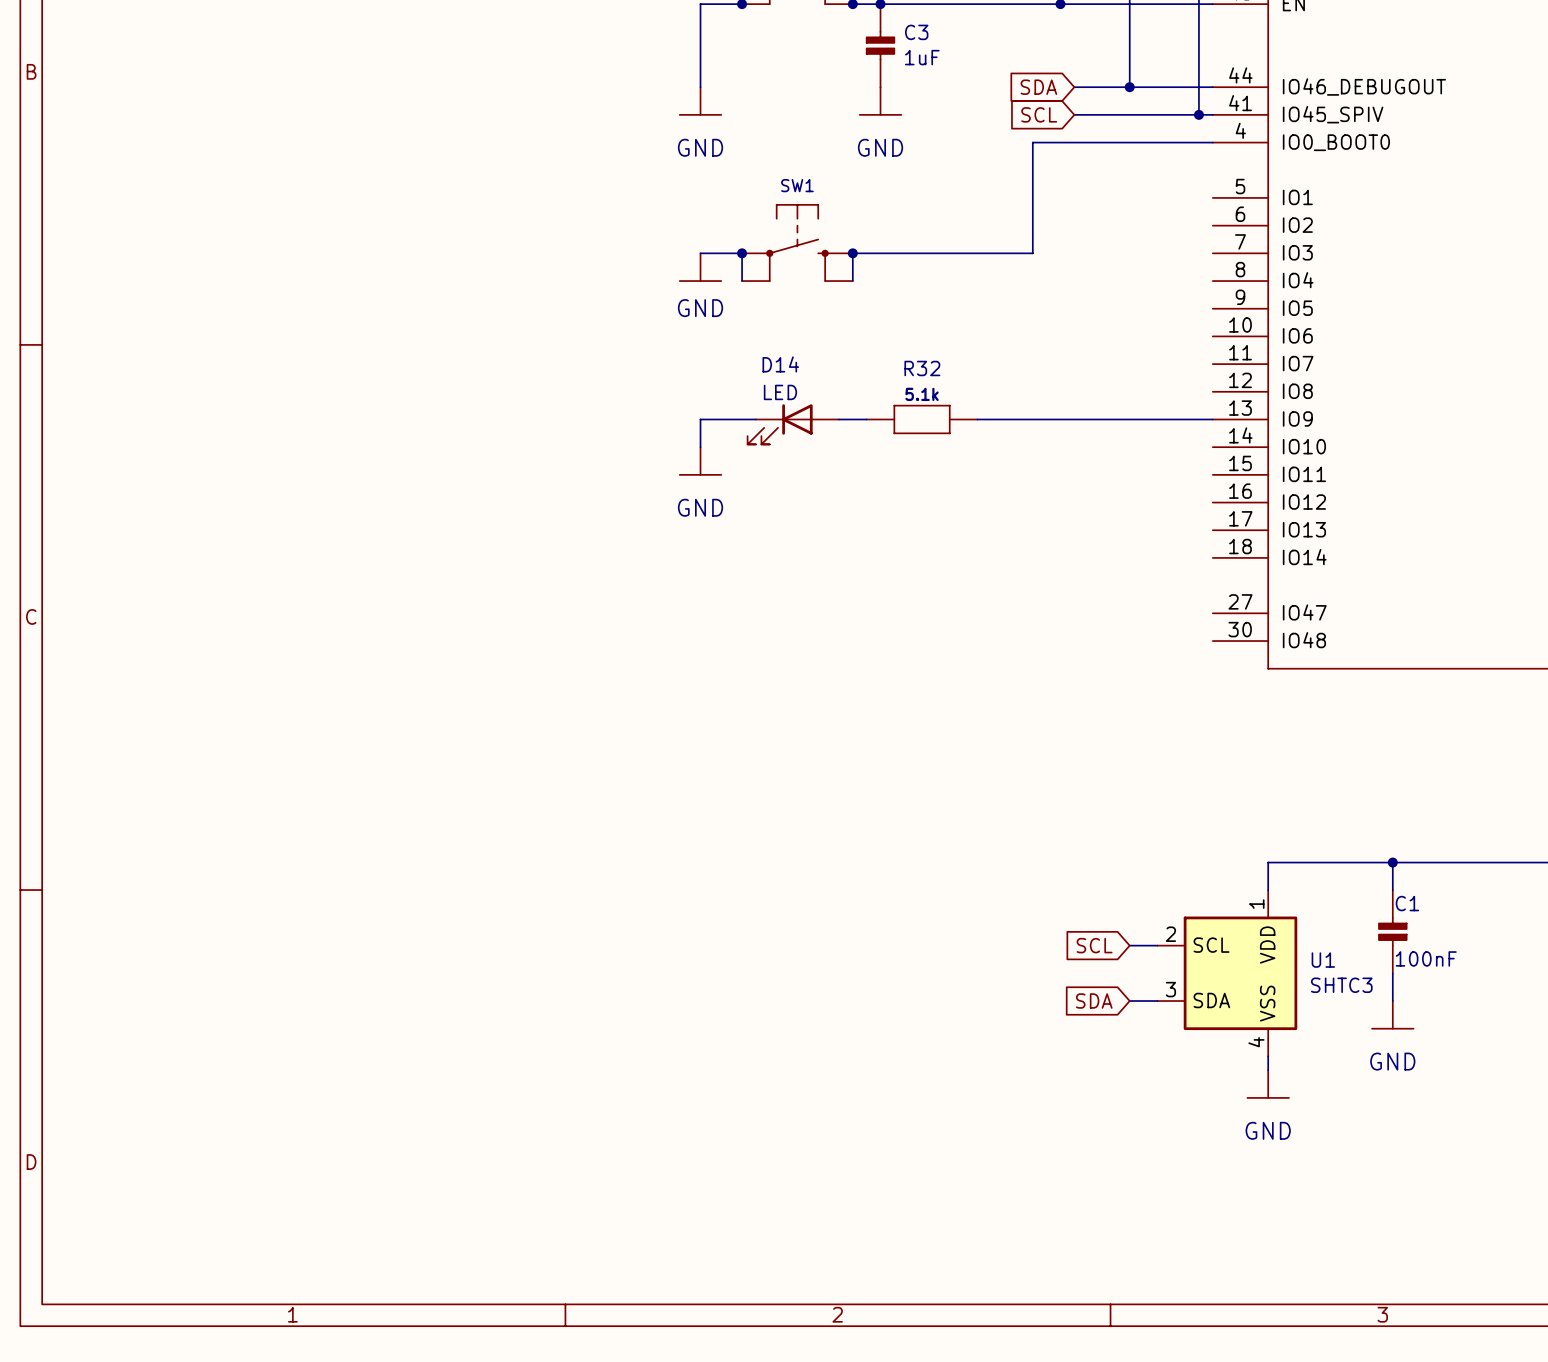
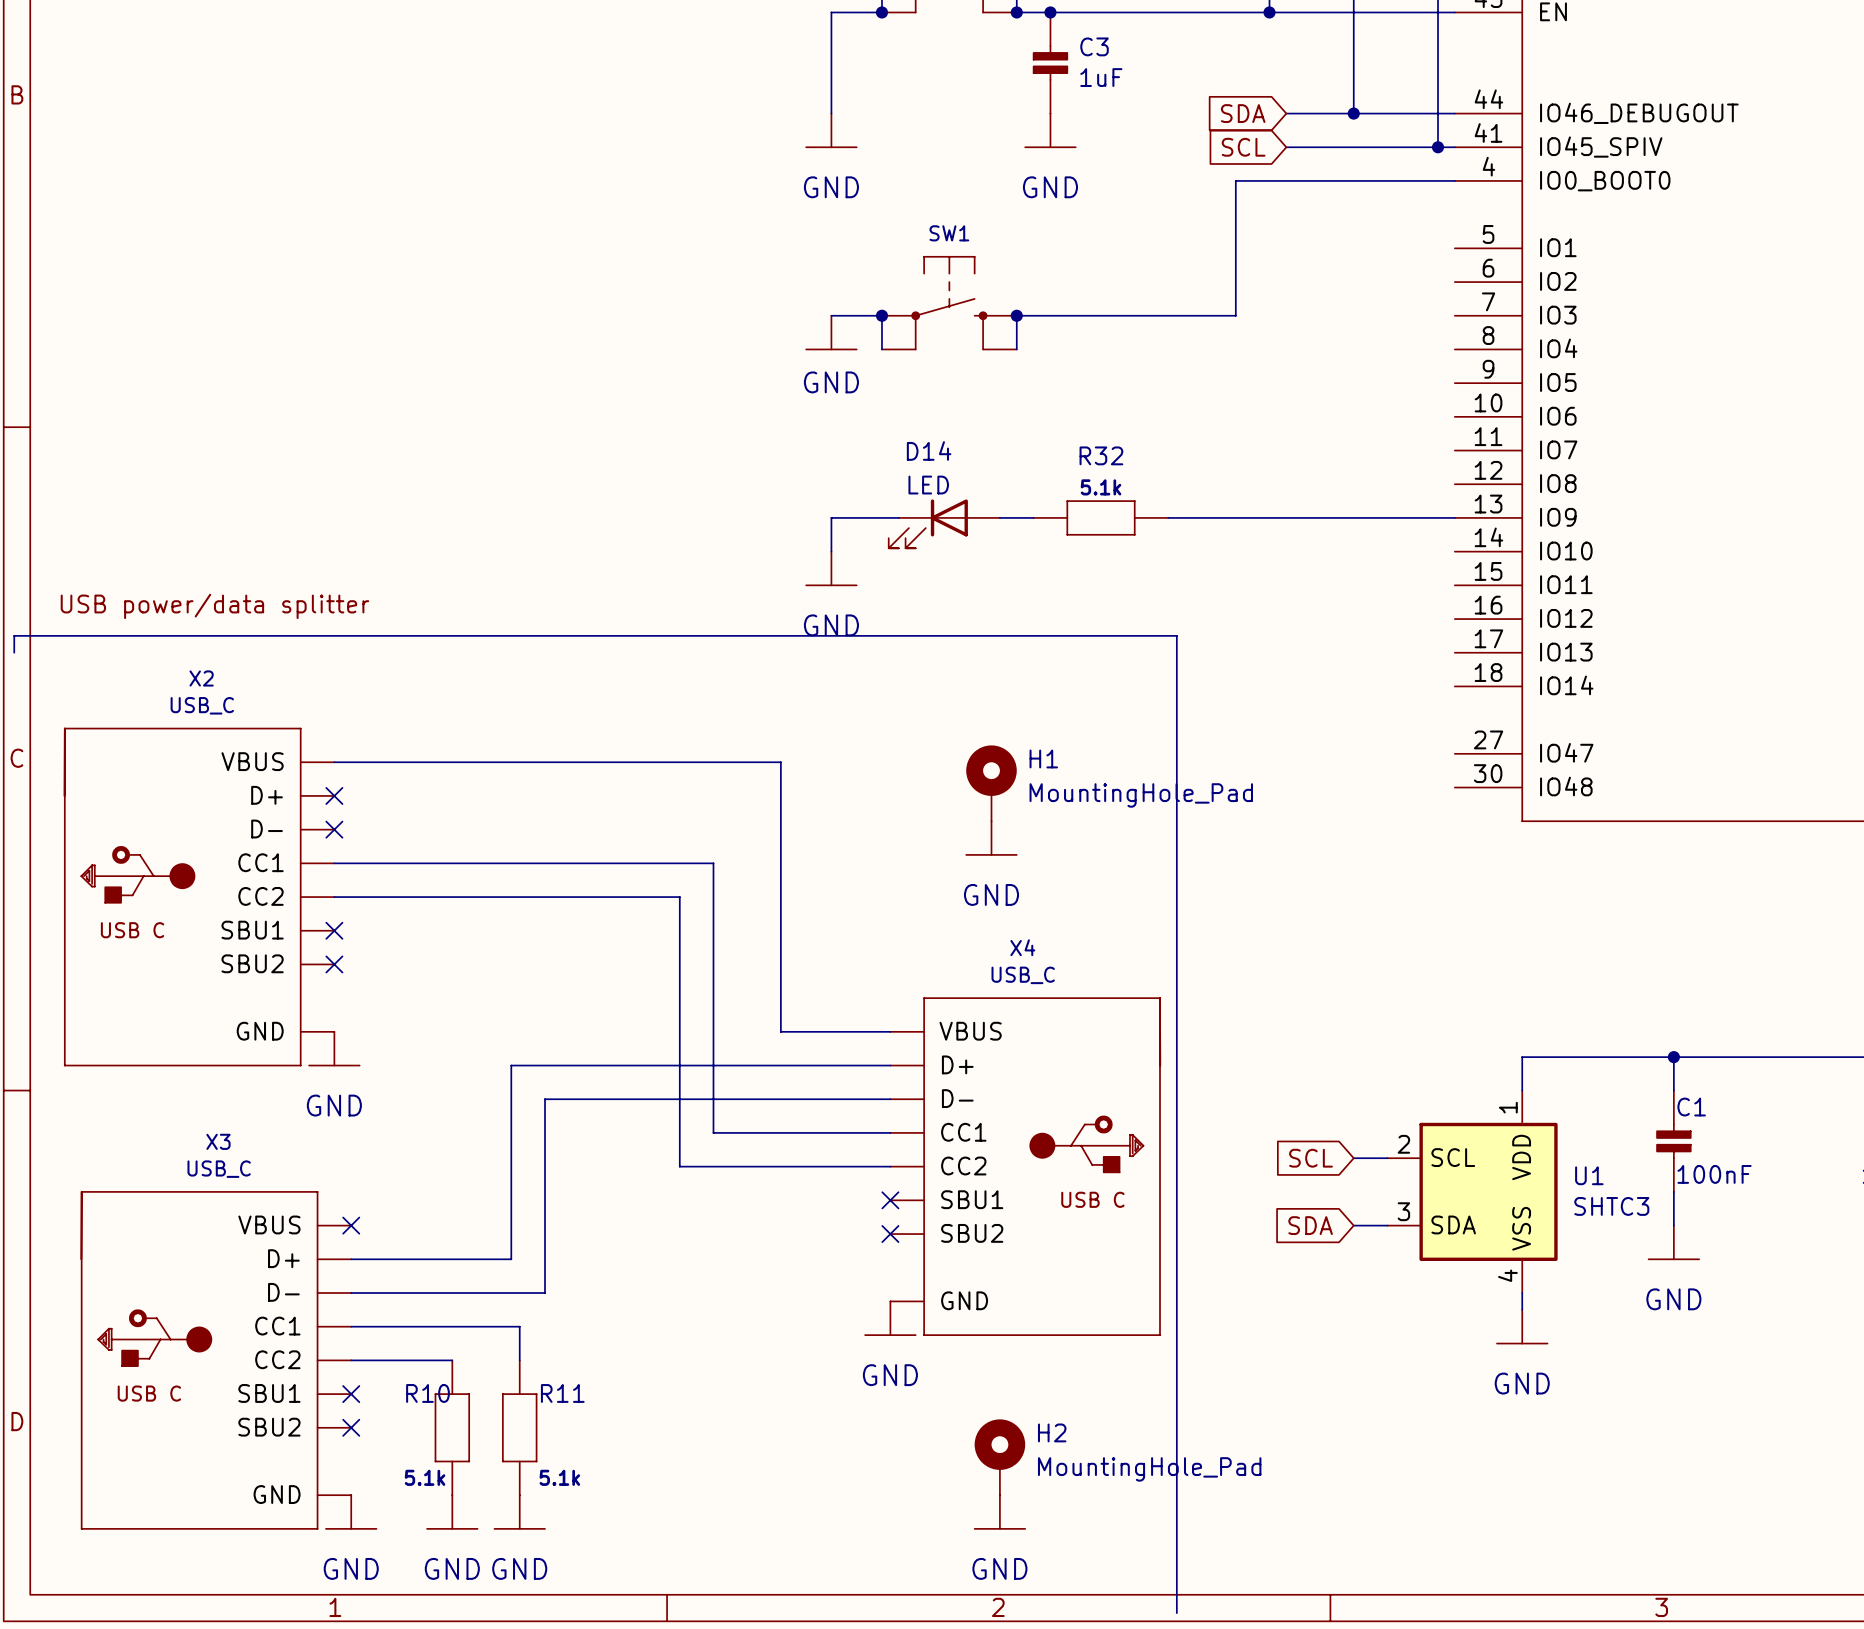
label: none -> USB power/data splitter (214, 606)
line: none -> (14, 652) (14, 635) (1176, 635) (1176, 1613)
wire: none -> (334, 762) (780, 762) (780, 1031) (890, 1031)
H1: none -> MountingHole_Pad (991, 783)
no-connect mark: none -> (334, 795)
no-connect mark: none -> (334, 829)
power symbol: none -> GND (991, 838)
wire: none -> (334, 863) (713, 863) (713, 1132) (890, 1132)
X2: none -> USB_C (199, 897)
wire: none -> (334, 897) (679, 897) (679, 1166) (890, 1166)
no-connect mark: none -> (334, 930)
no-connect mark: none -> (334, 964)
power symbol: none -> GND (334, 1048)
wire: none -> (890, 1065) (511, 1065) (511, 1259) (351, 1259)
wire: none -> (890, 1099) (545, 1099) (545, 1293) (351, 1293)
X4: none -> USB_C (1025, 1166)
no-connect mark: none -> (890, 1200)
no-connect mark: none -> (351, 1225)
no-connect mark: none -> (890, 1234)
power symbol: none -> GND (890, 1318)
wire: none -> (351, 1326) (519, 1326) (519, 1360)
X3: none -> USB_C (216, 1360)
wire: none -> (351, 1360) (452, 1360)
no-connect mark: none -> (351, 1394)
no-connect mark: none -> (351, 1427)
R10: none -> 5.1k (452, 1427)
R11: none -> 5.1k (519, 1427)
H2: none -> MountingHole_Pad (999, 1457)
power symbol: none -> GND (351, 1512)
power symbol: none -> GND (452, 1512)
power symbol: none -> GND (519, 1512)
power symbol: none -> GND (999, 1512)

